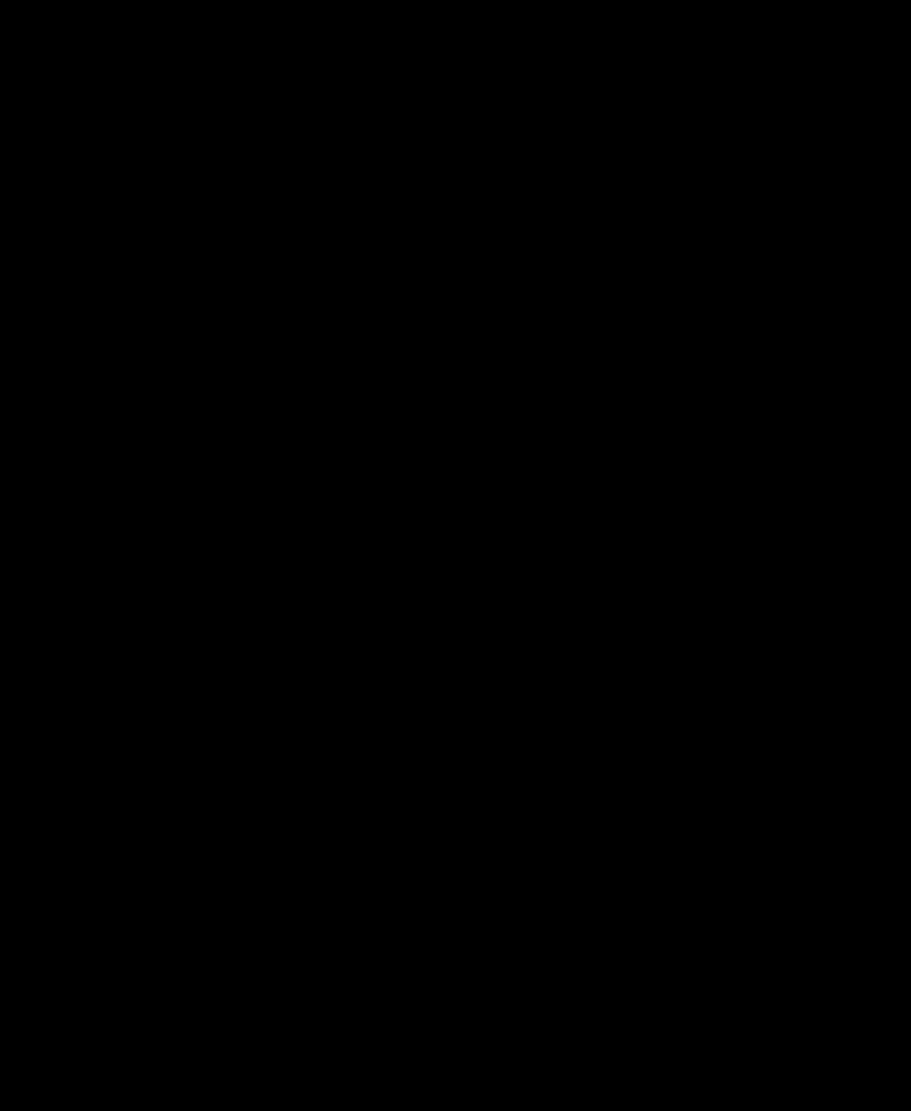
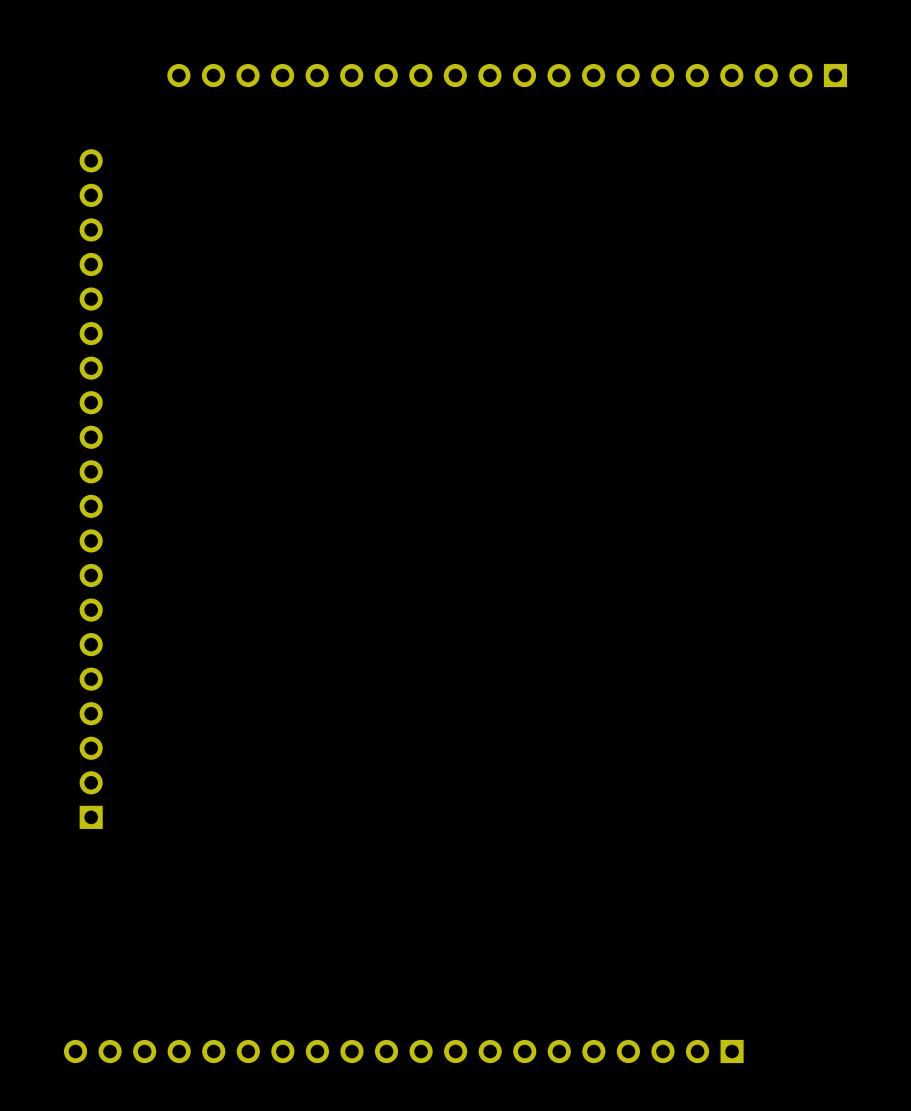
part: none -> (507, 75)
part: none -> (91, 489)
part: none -> (403, 1051)

